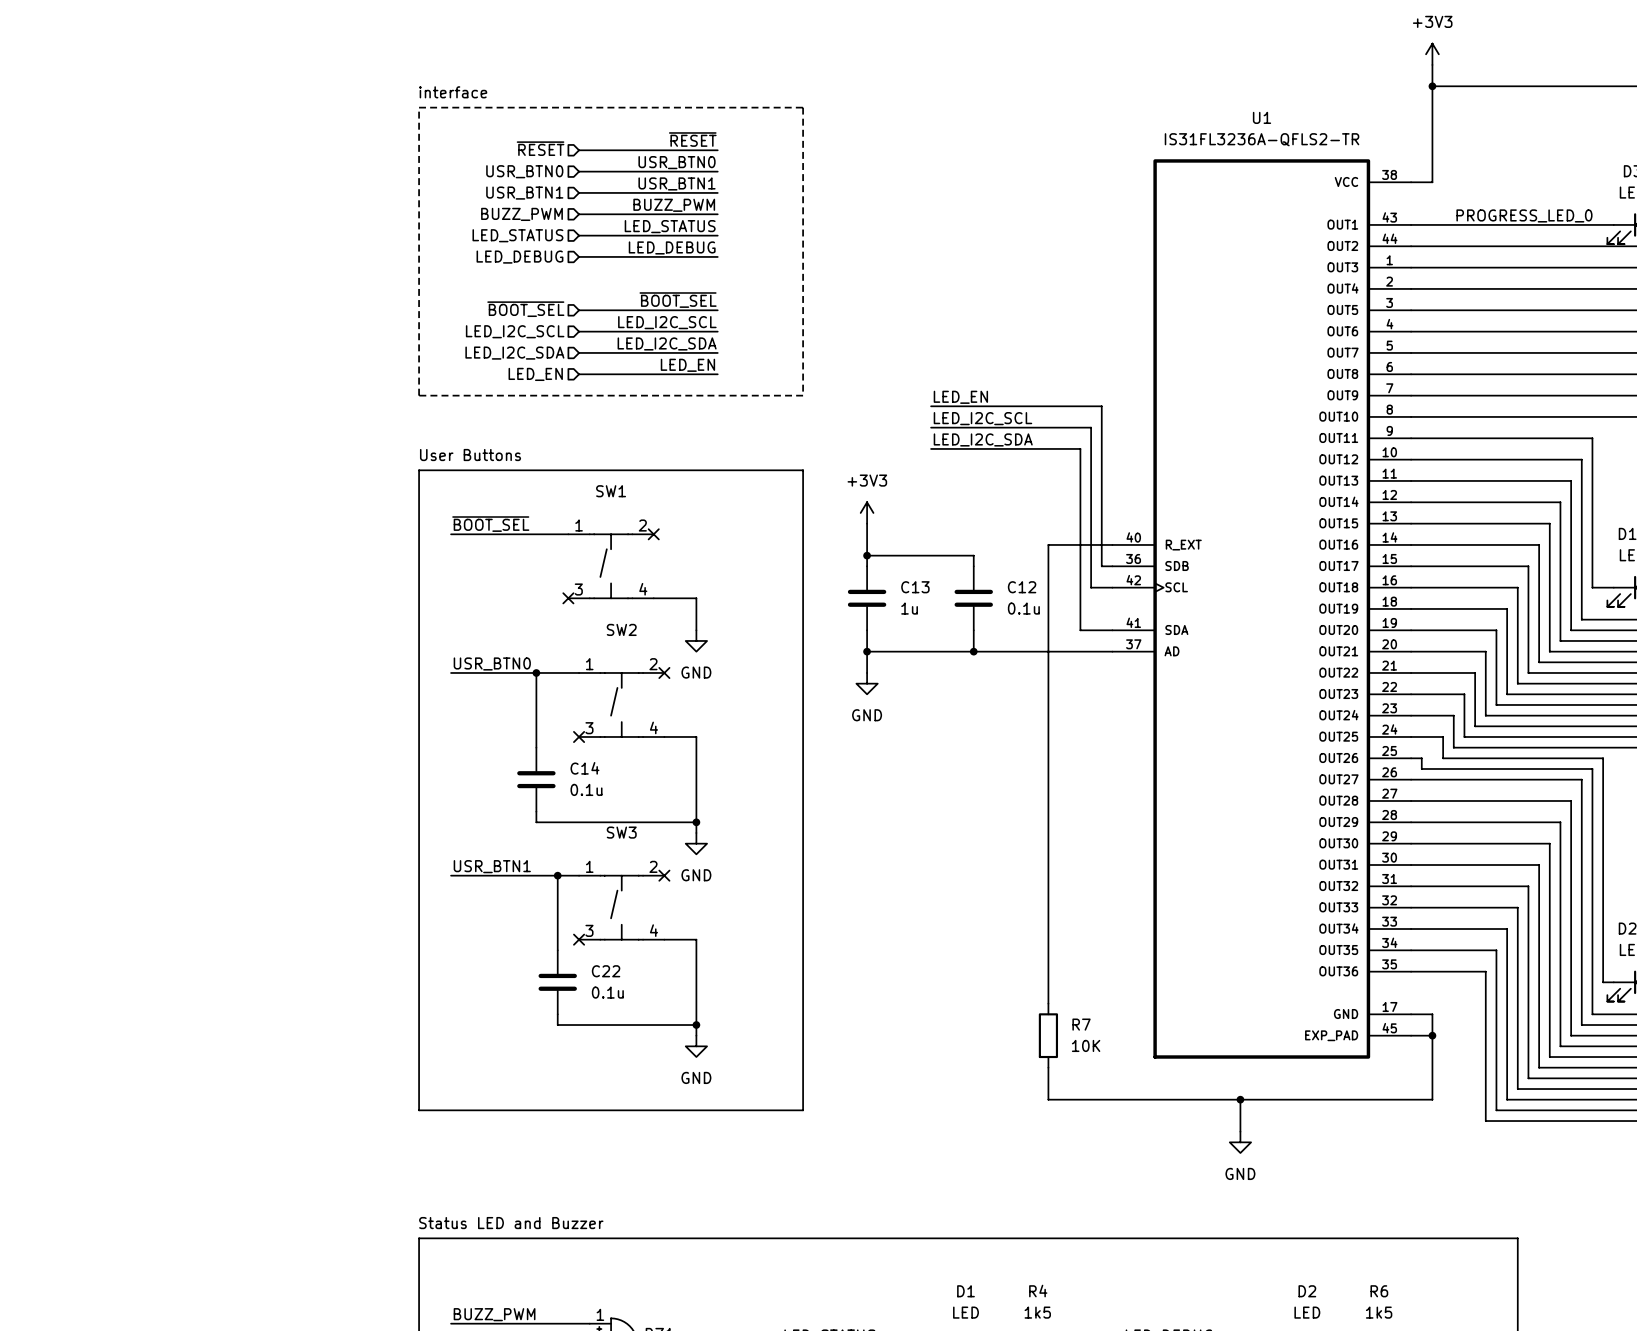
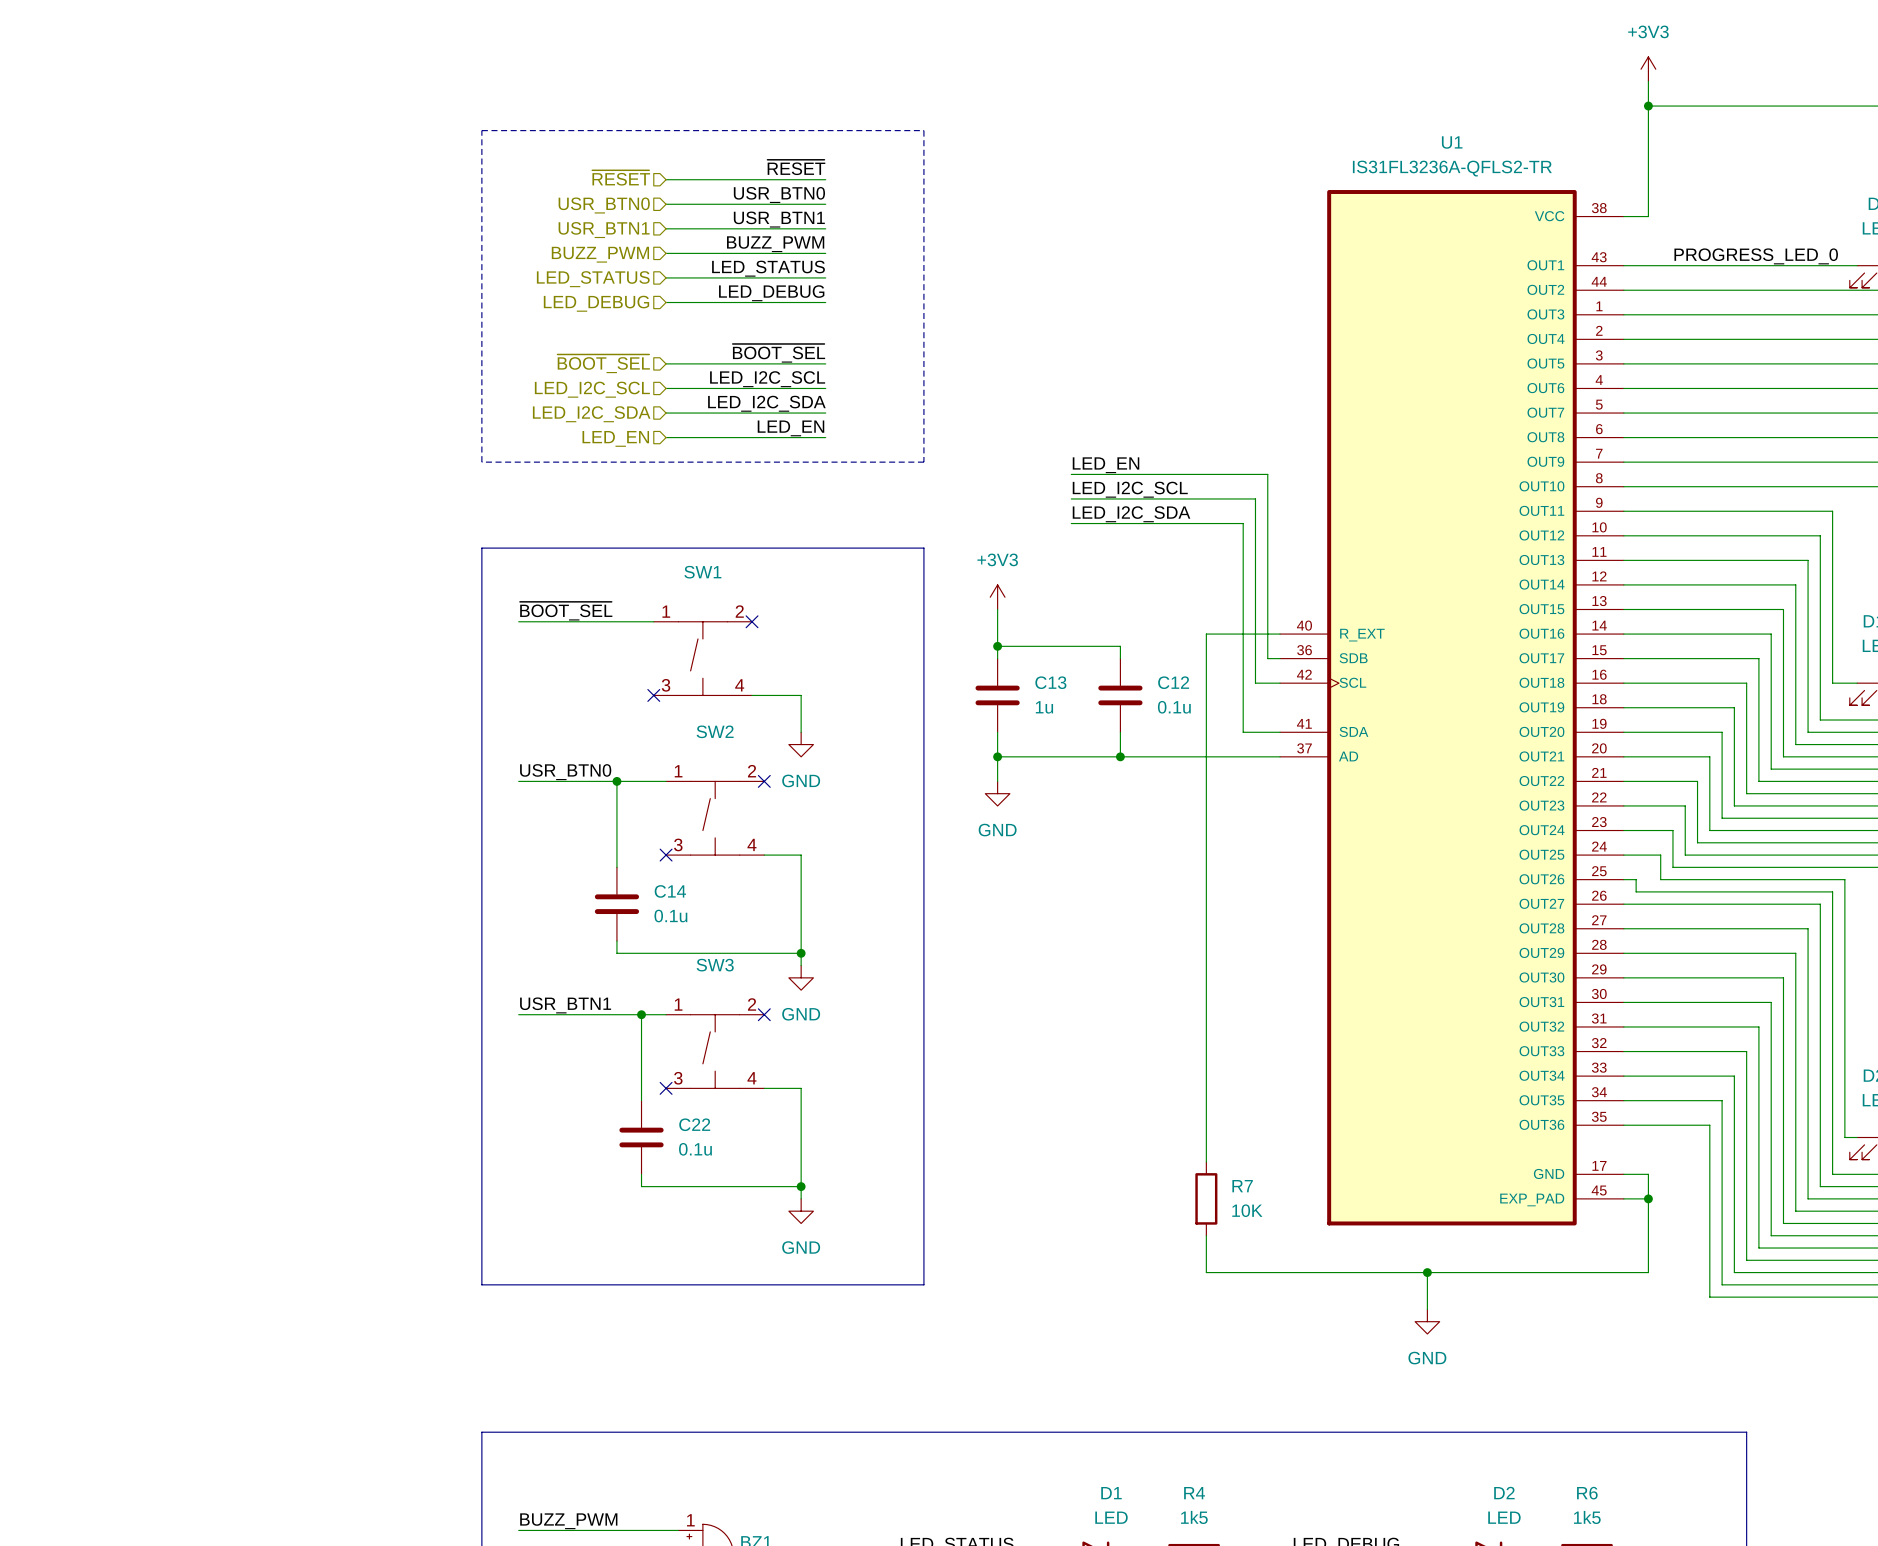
text: interface (453, 92) -> none
text: User Buttons (470, 455) -> none
text: Status LED and Buzzer (511, 1223) -> none

